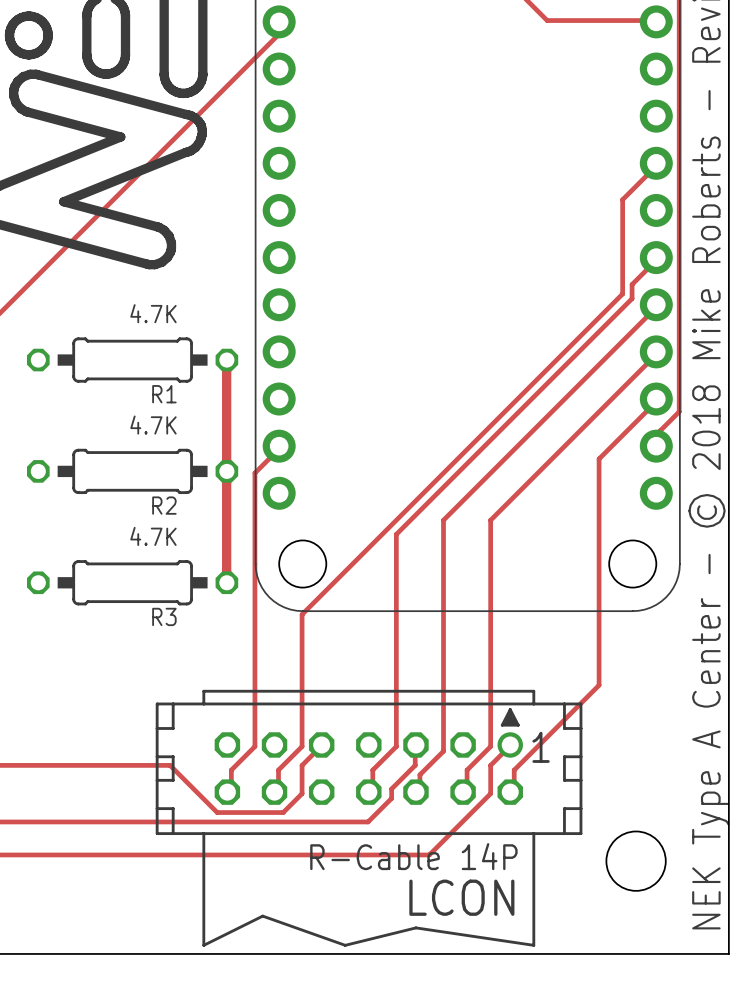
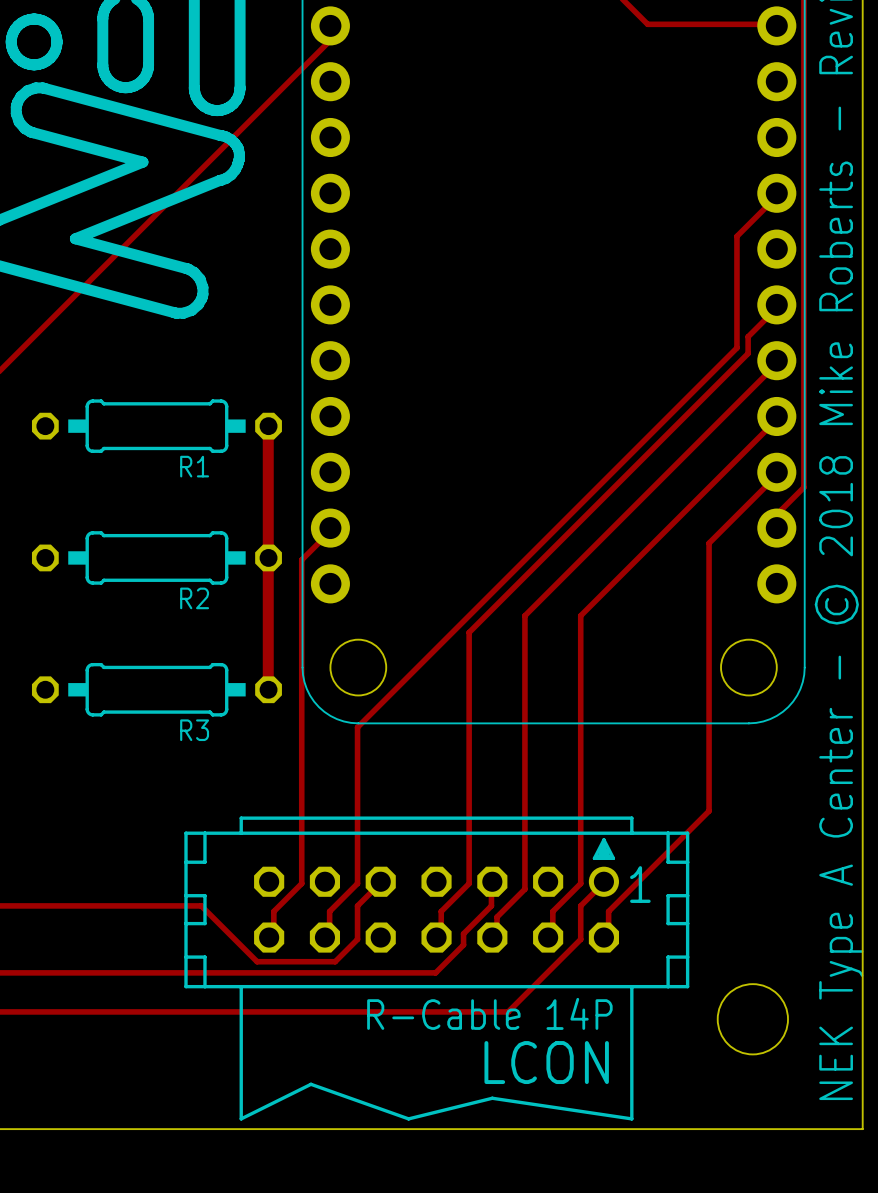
R1 value: 4.7K (153, 313) -> none
R2 value: 4.7K (153, 425) -> none
R3 value: 4.7K (153, 536) -> none

